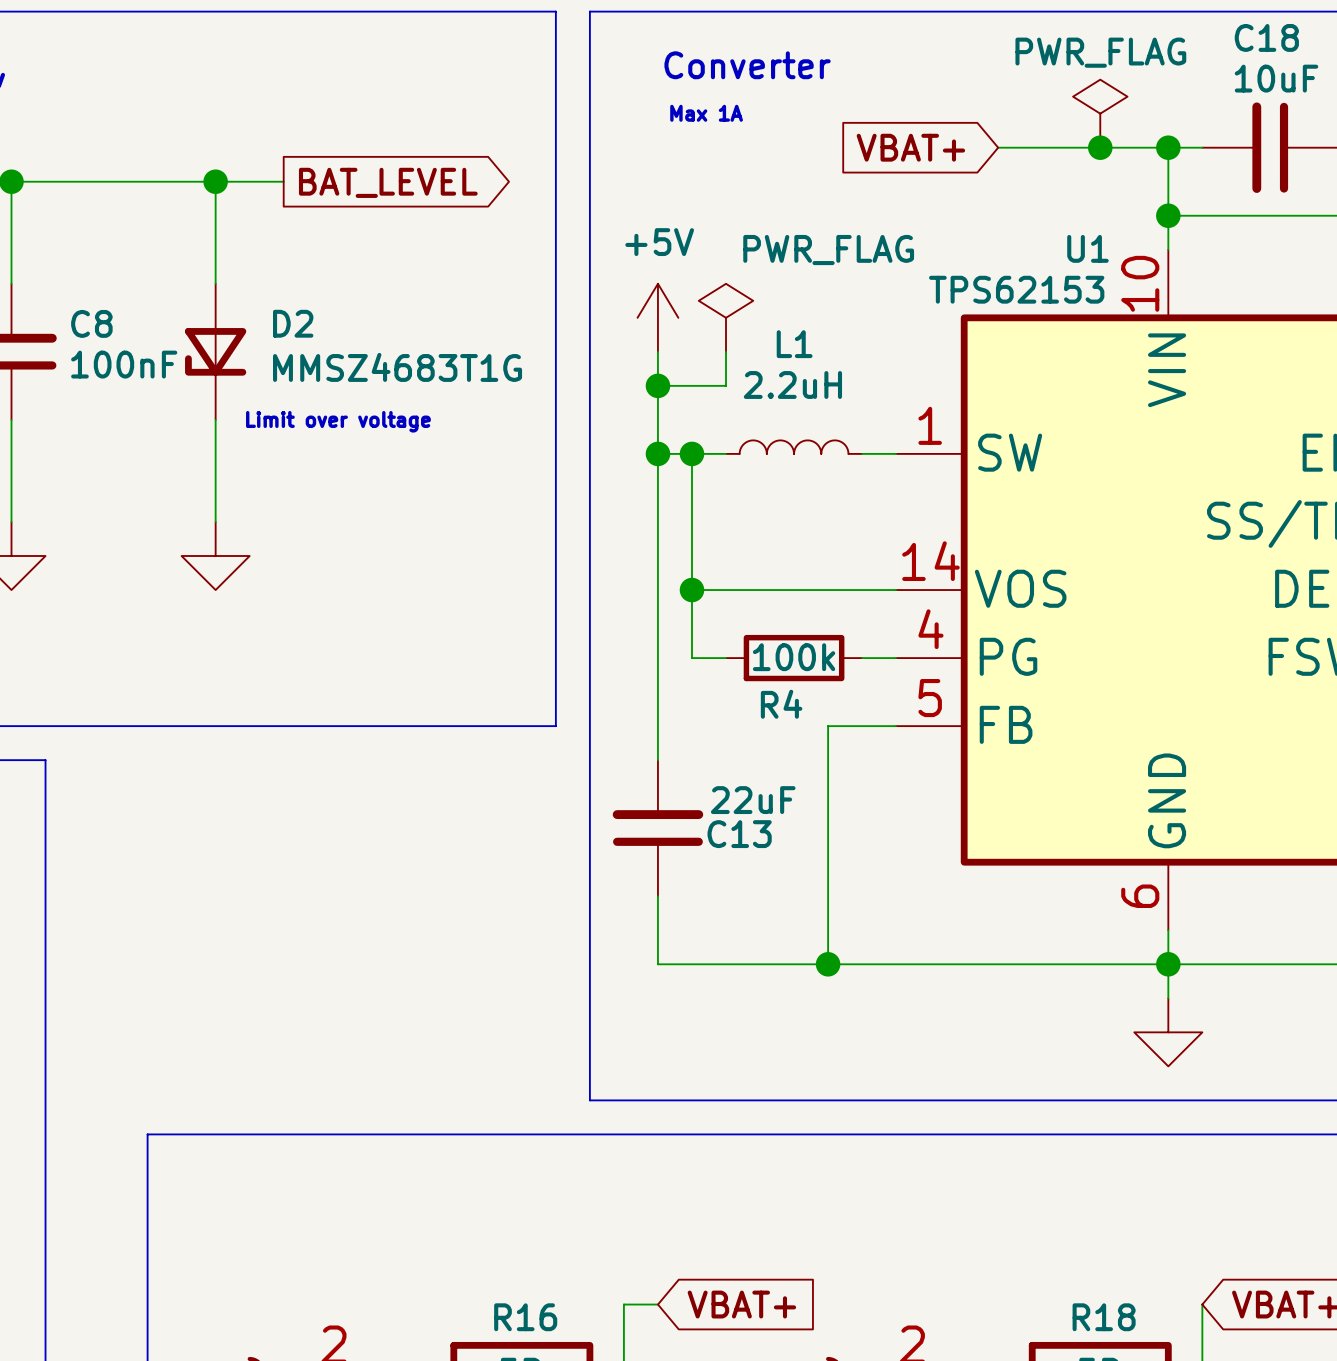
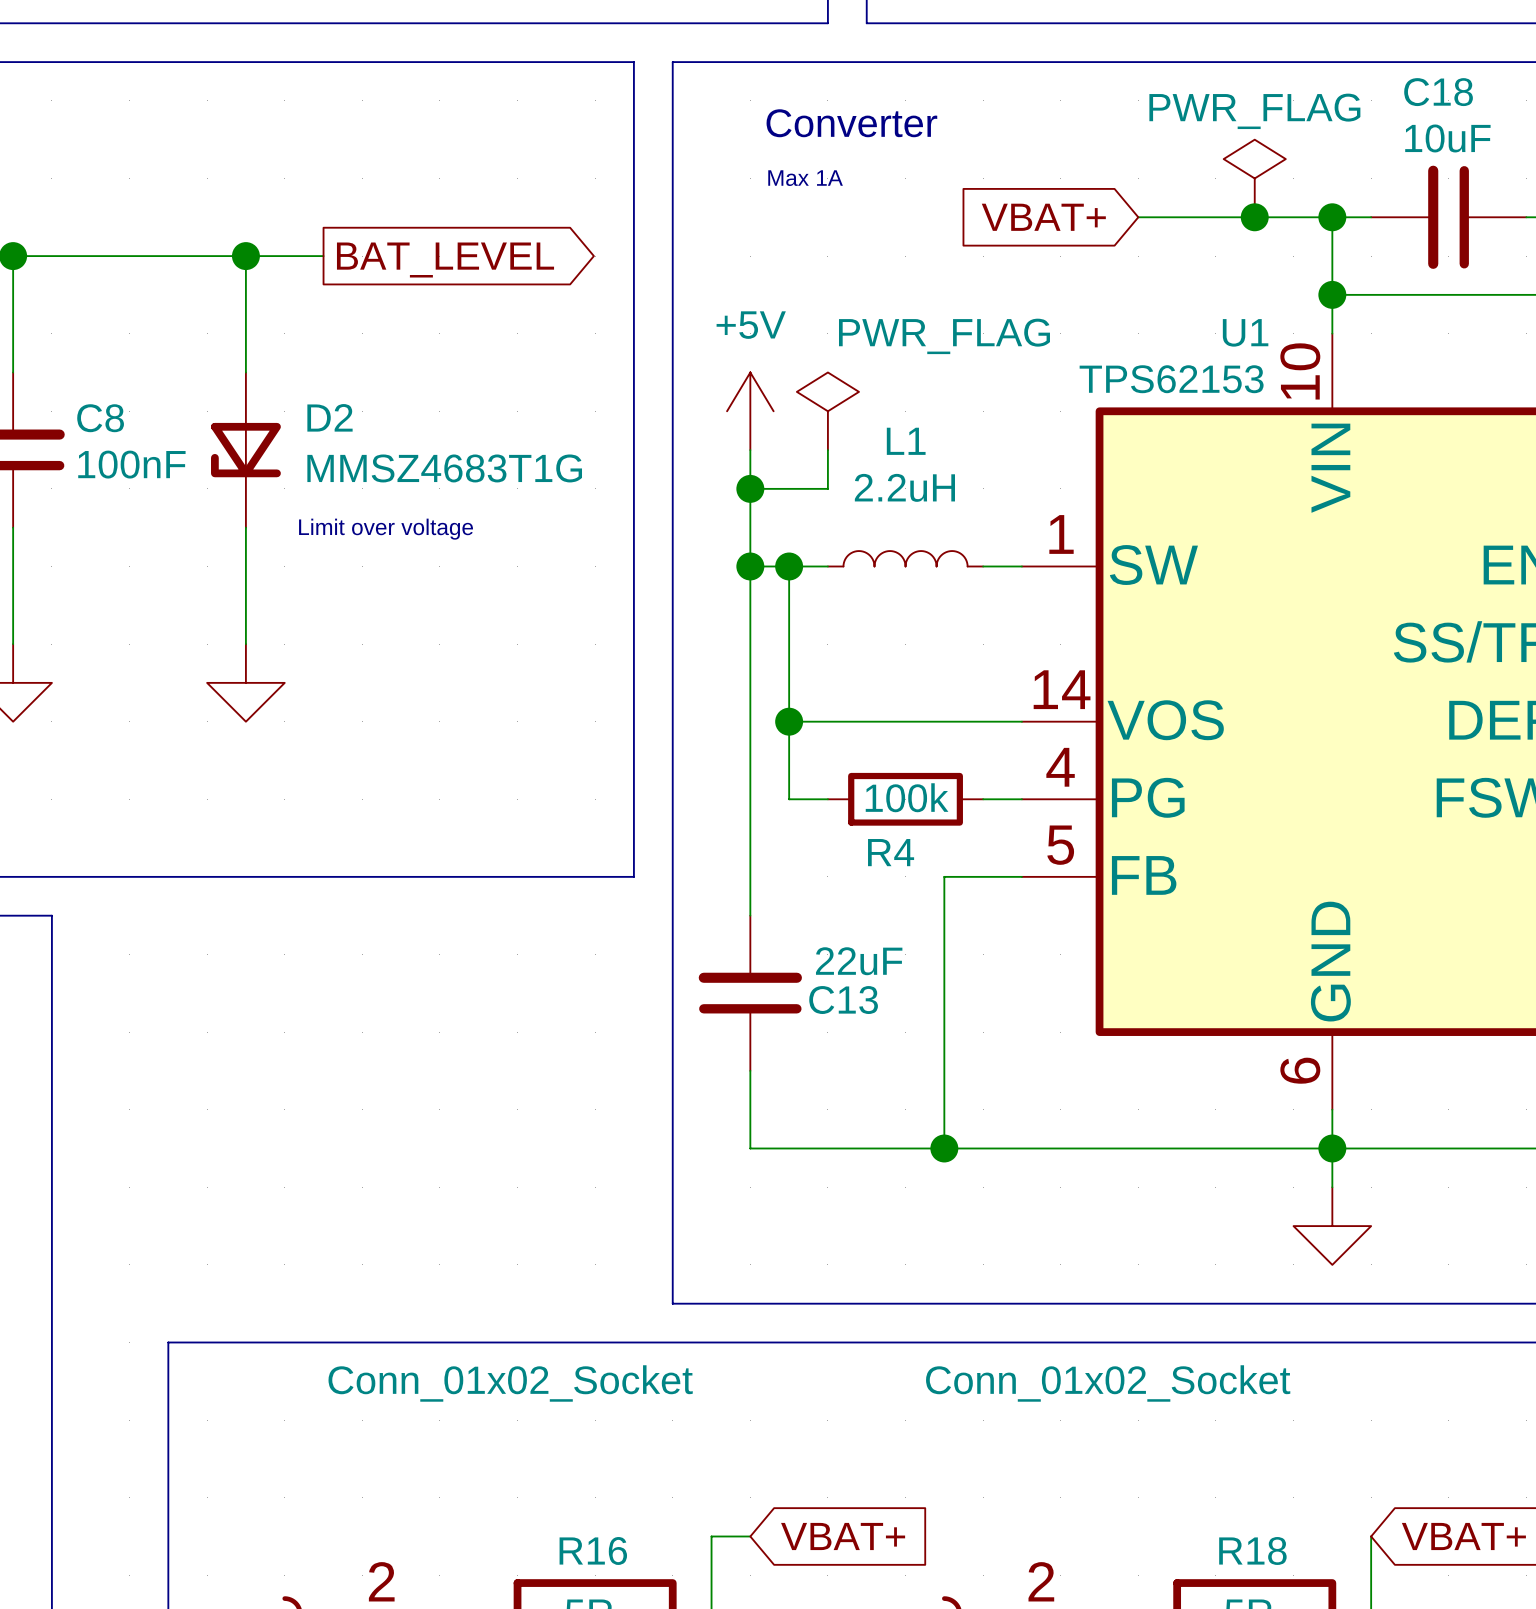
part value: none -> Conn_01x02_Socket (510, 1383)
part value: none -> Conn_01x02_Socket (1108, 1383)

